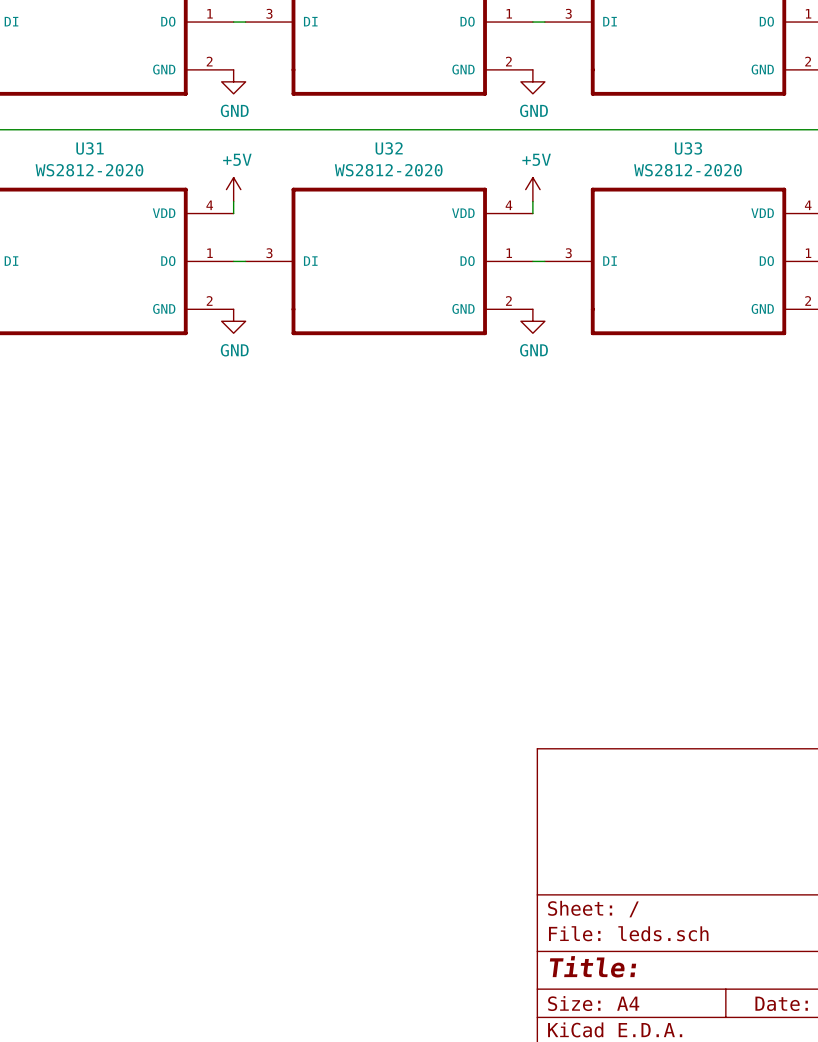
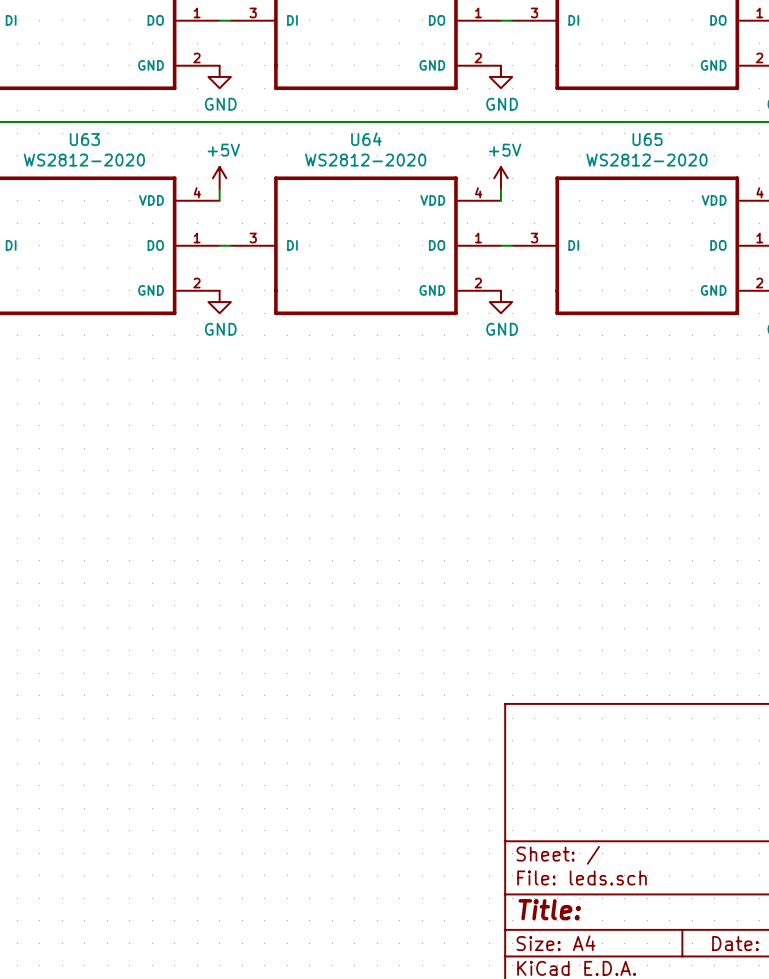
U31 name: U31 (90, 148) -> U63 (84, 139)
U32 name: U32 (389, 148) -> U64 (366, 139)
U33 name: U33 (688, 148) -> U65 (647, 139)

